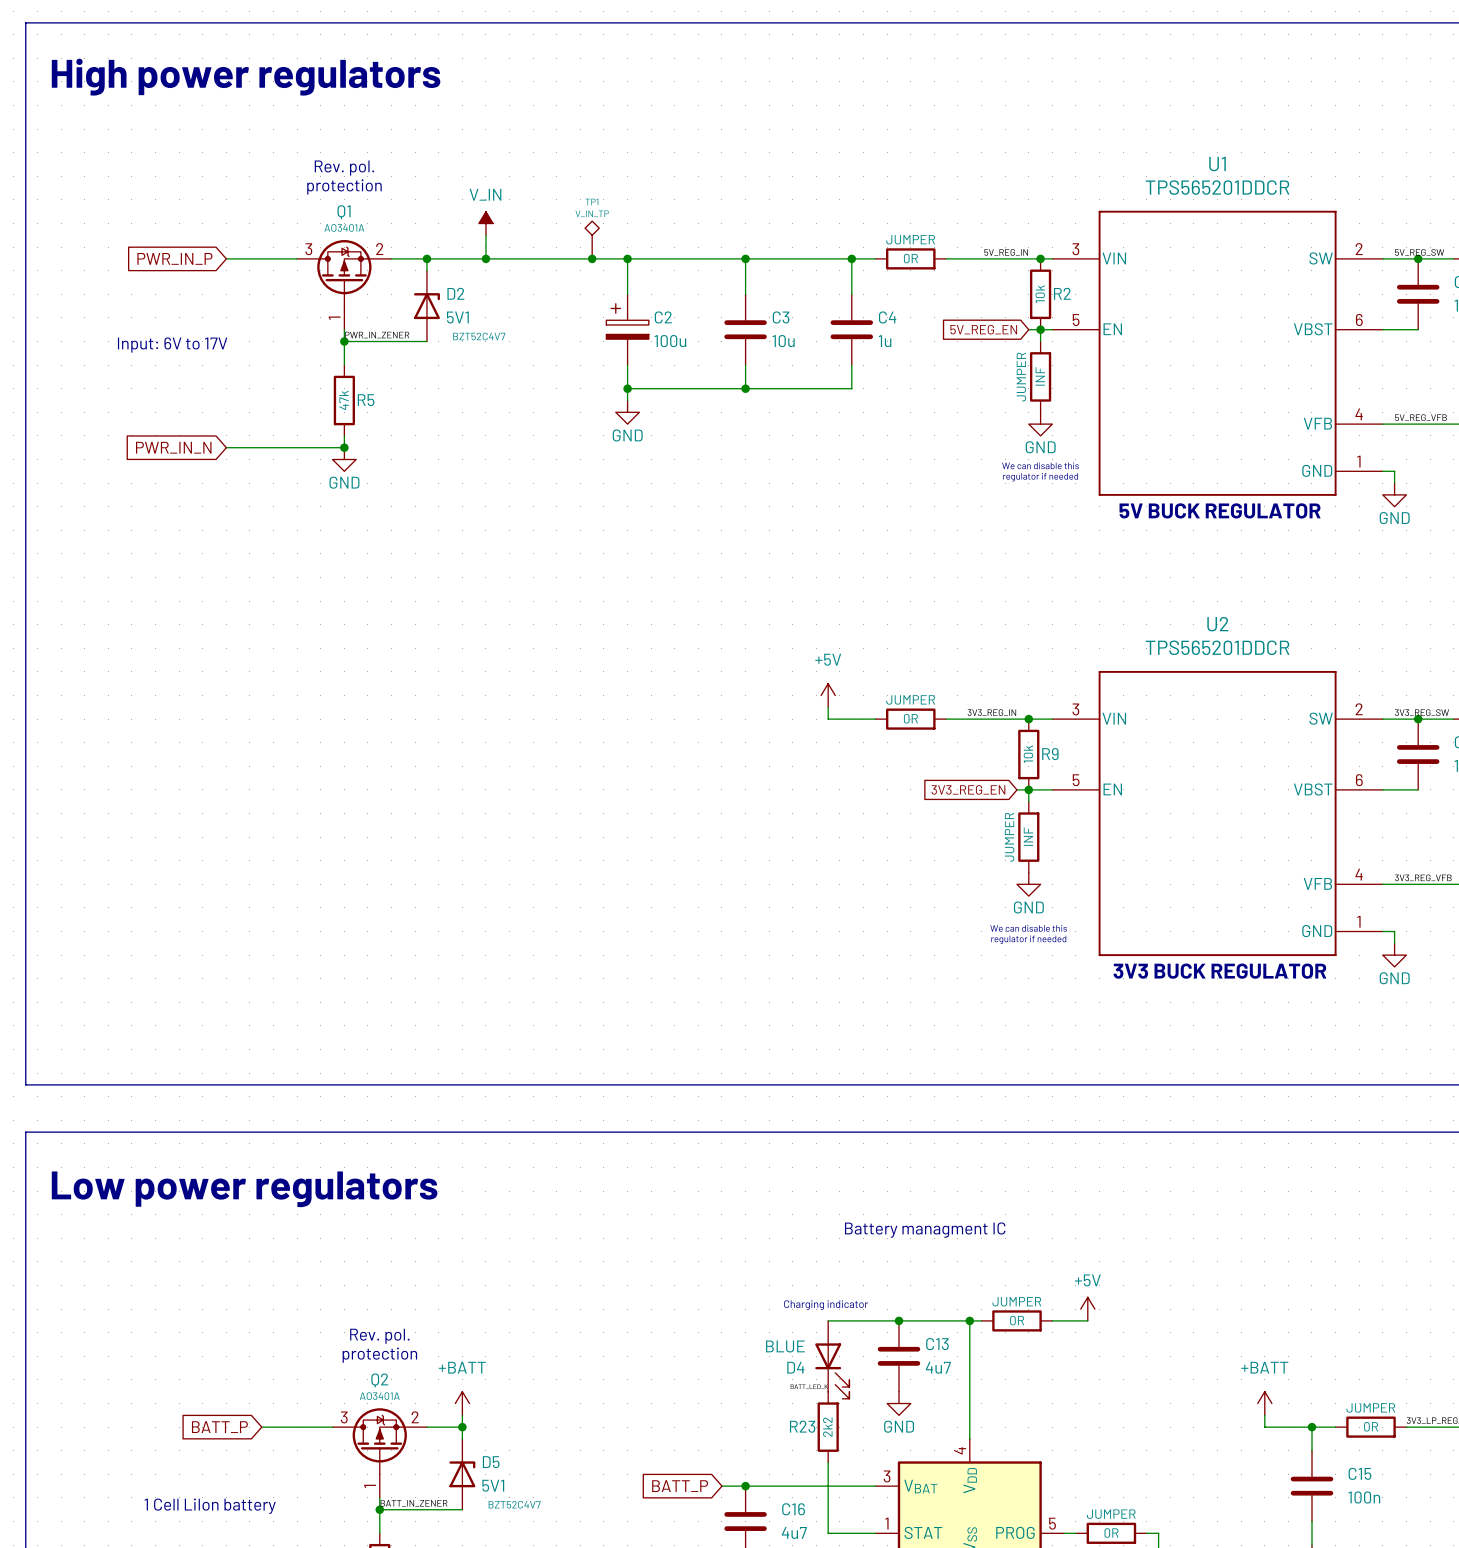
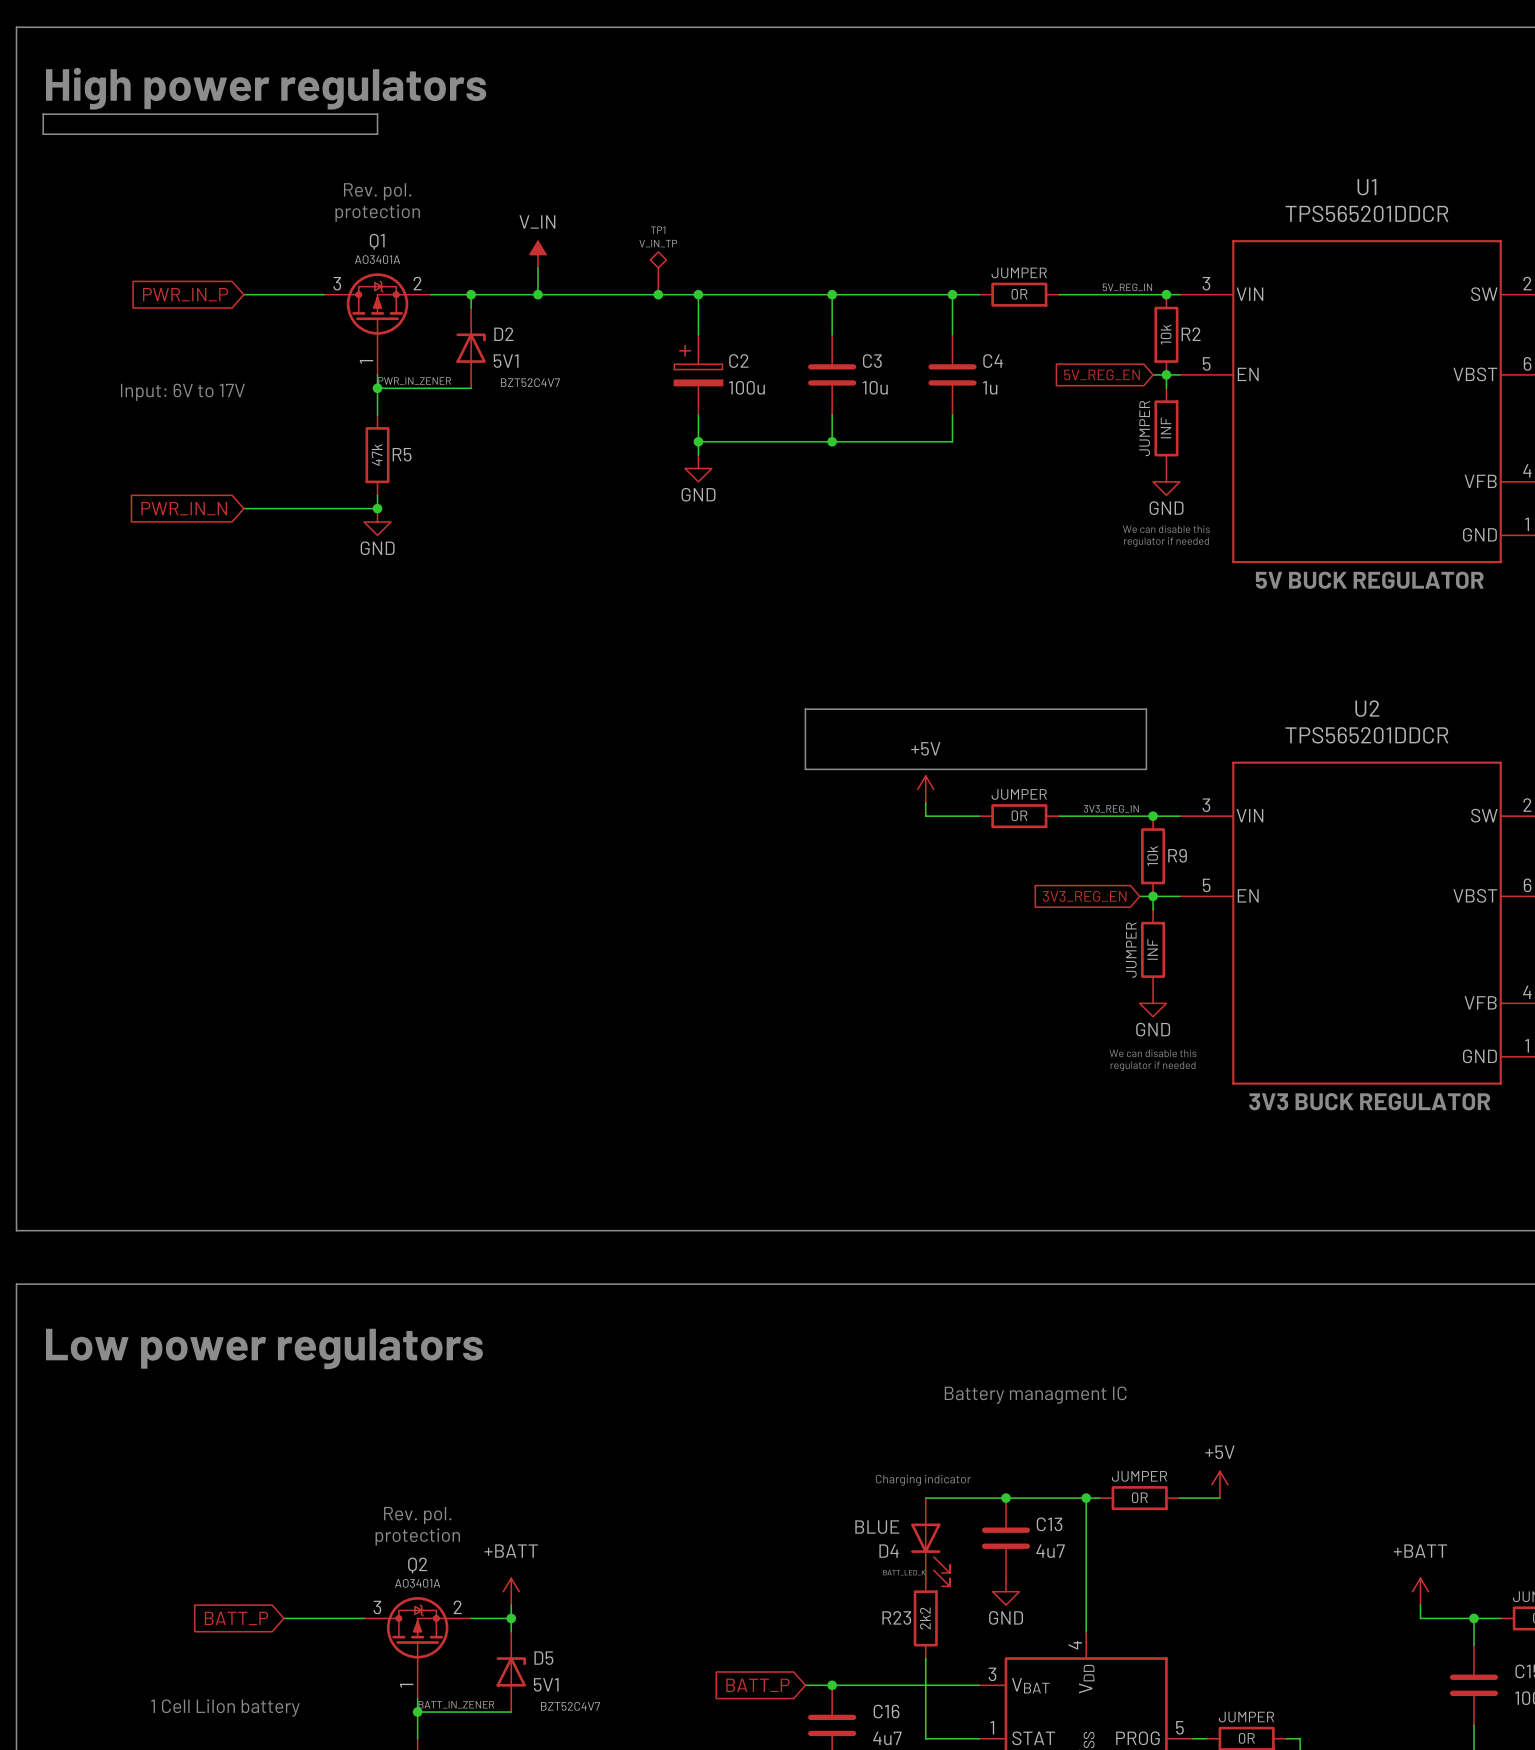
line: none -> (43, 114) (377, 114) (377, 134) (43, 134) (43, 114)
line: none -> (805, 709) (1146, 709) (1146, 769) (805, 769) (805, 709)

